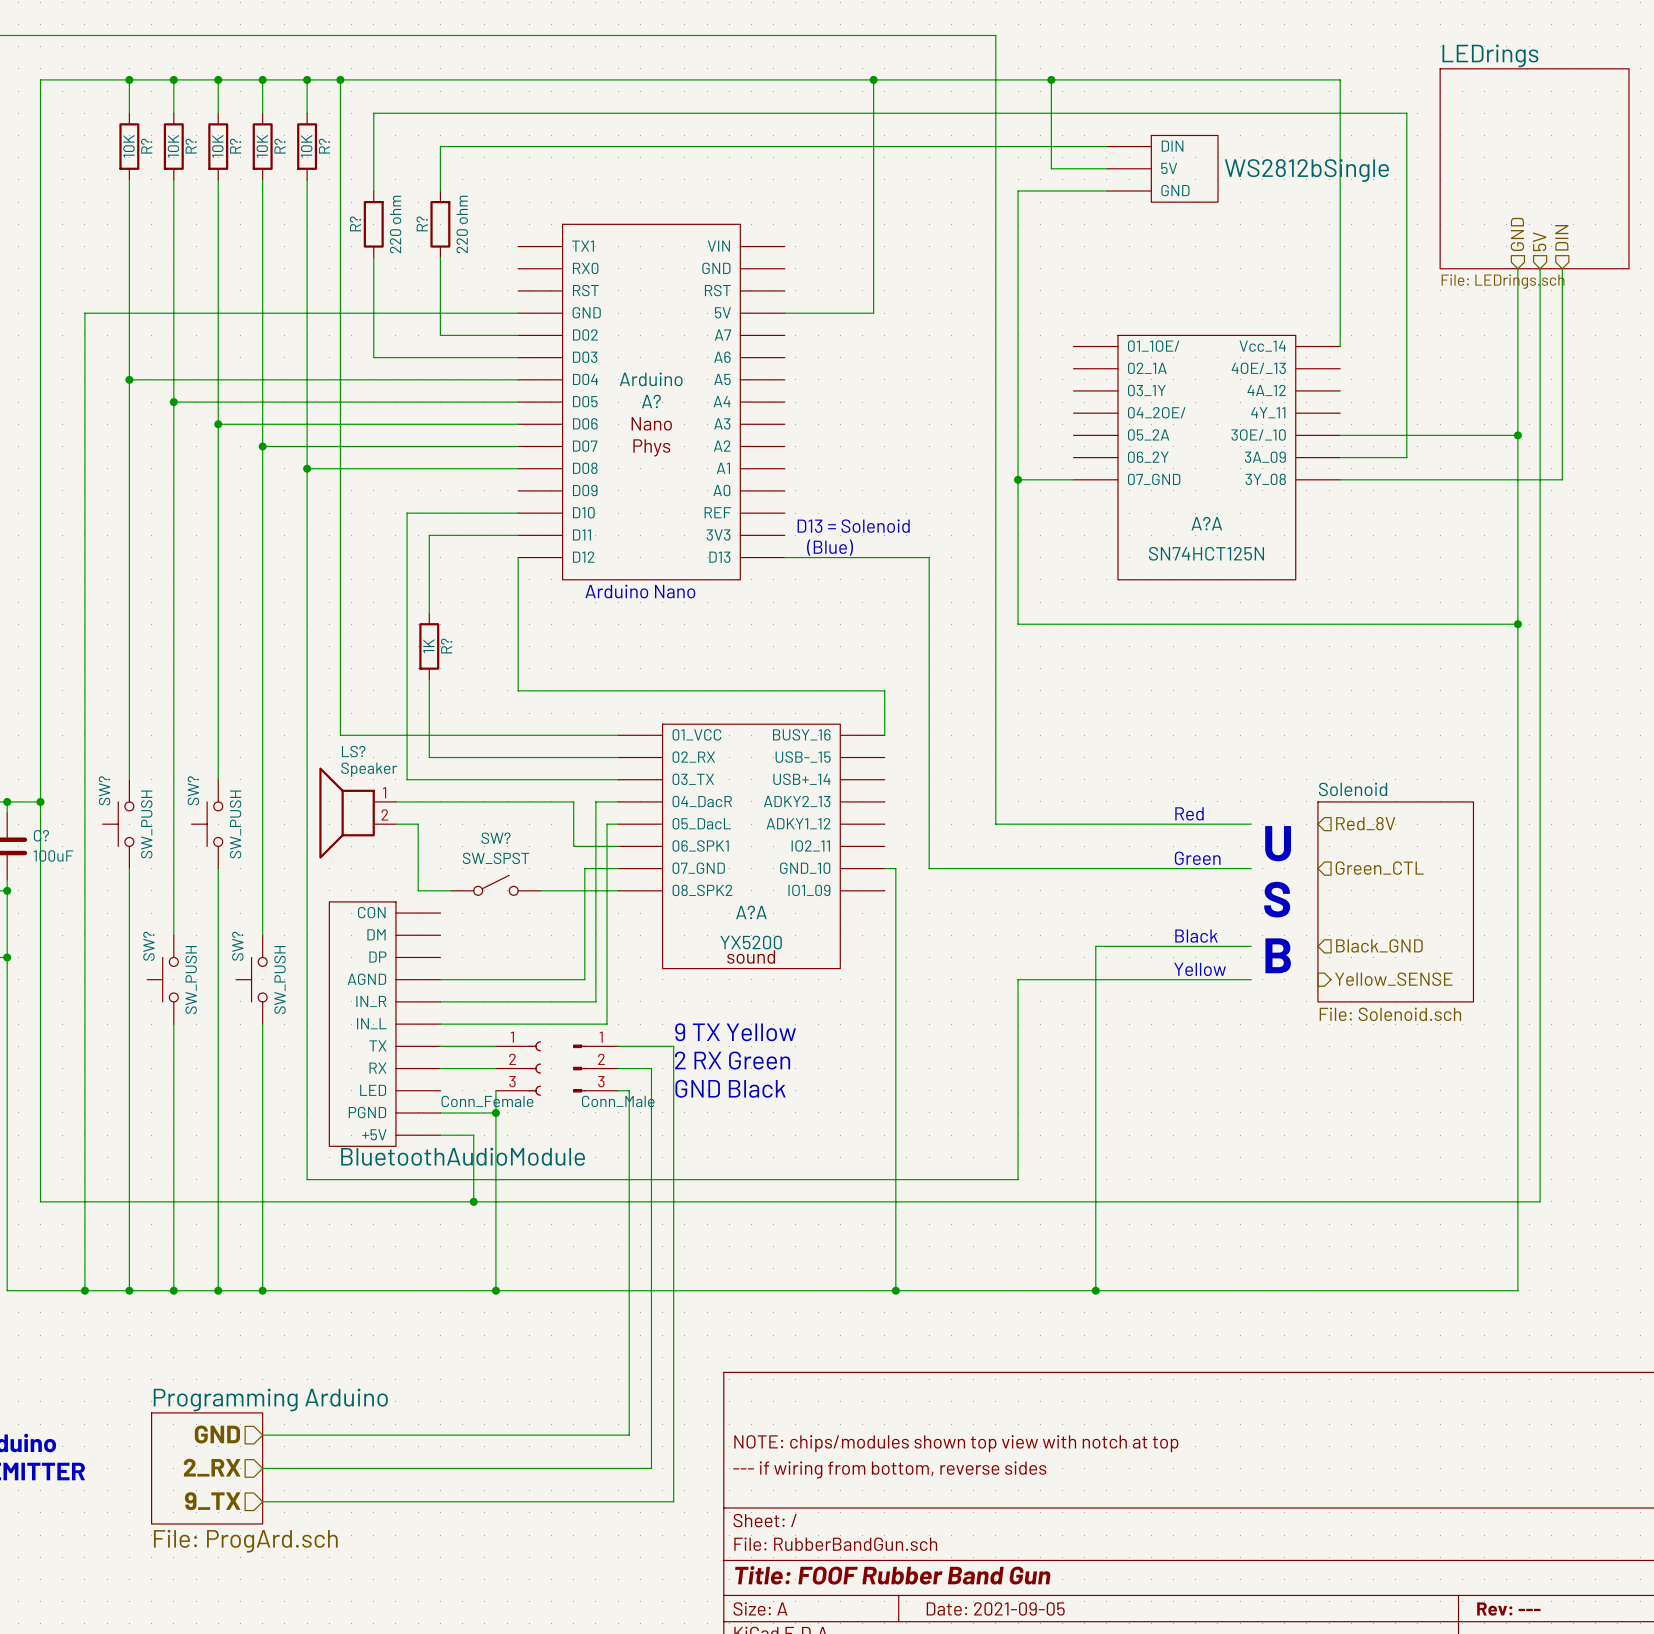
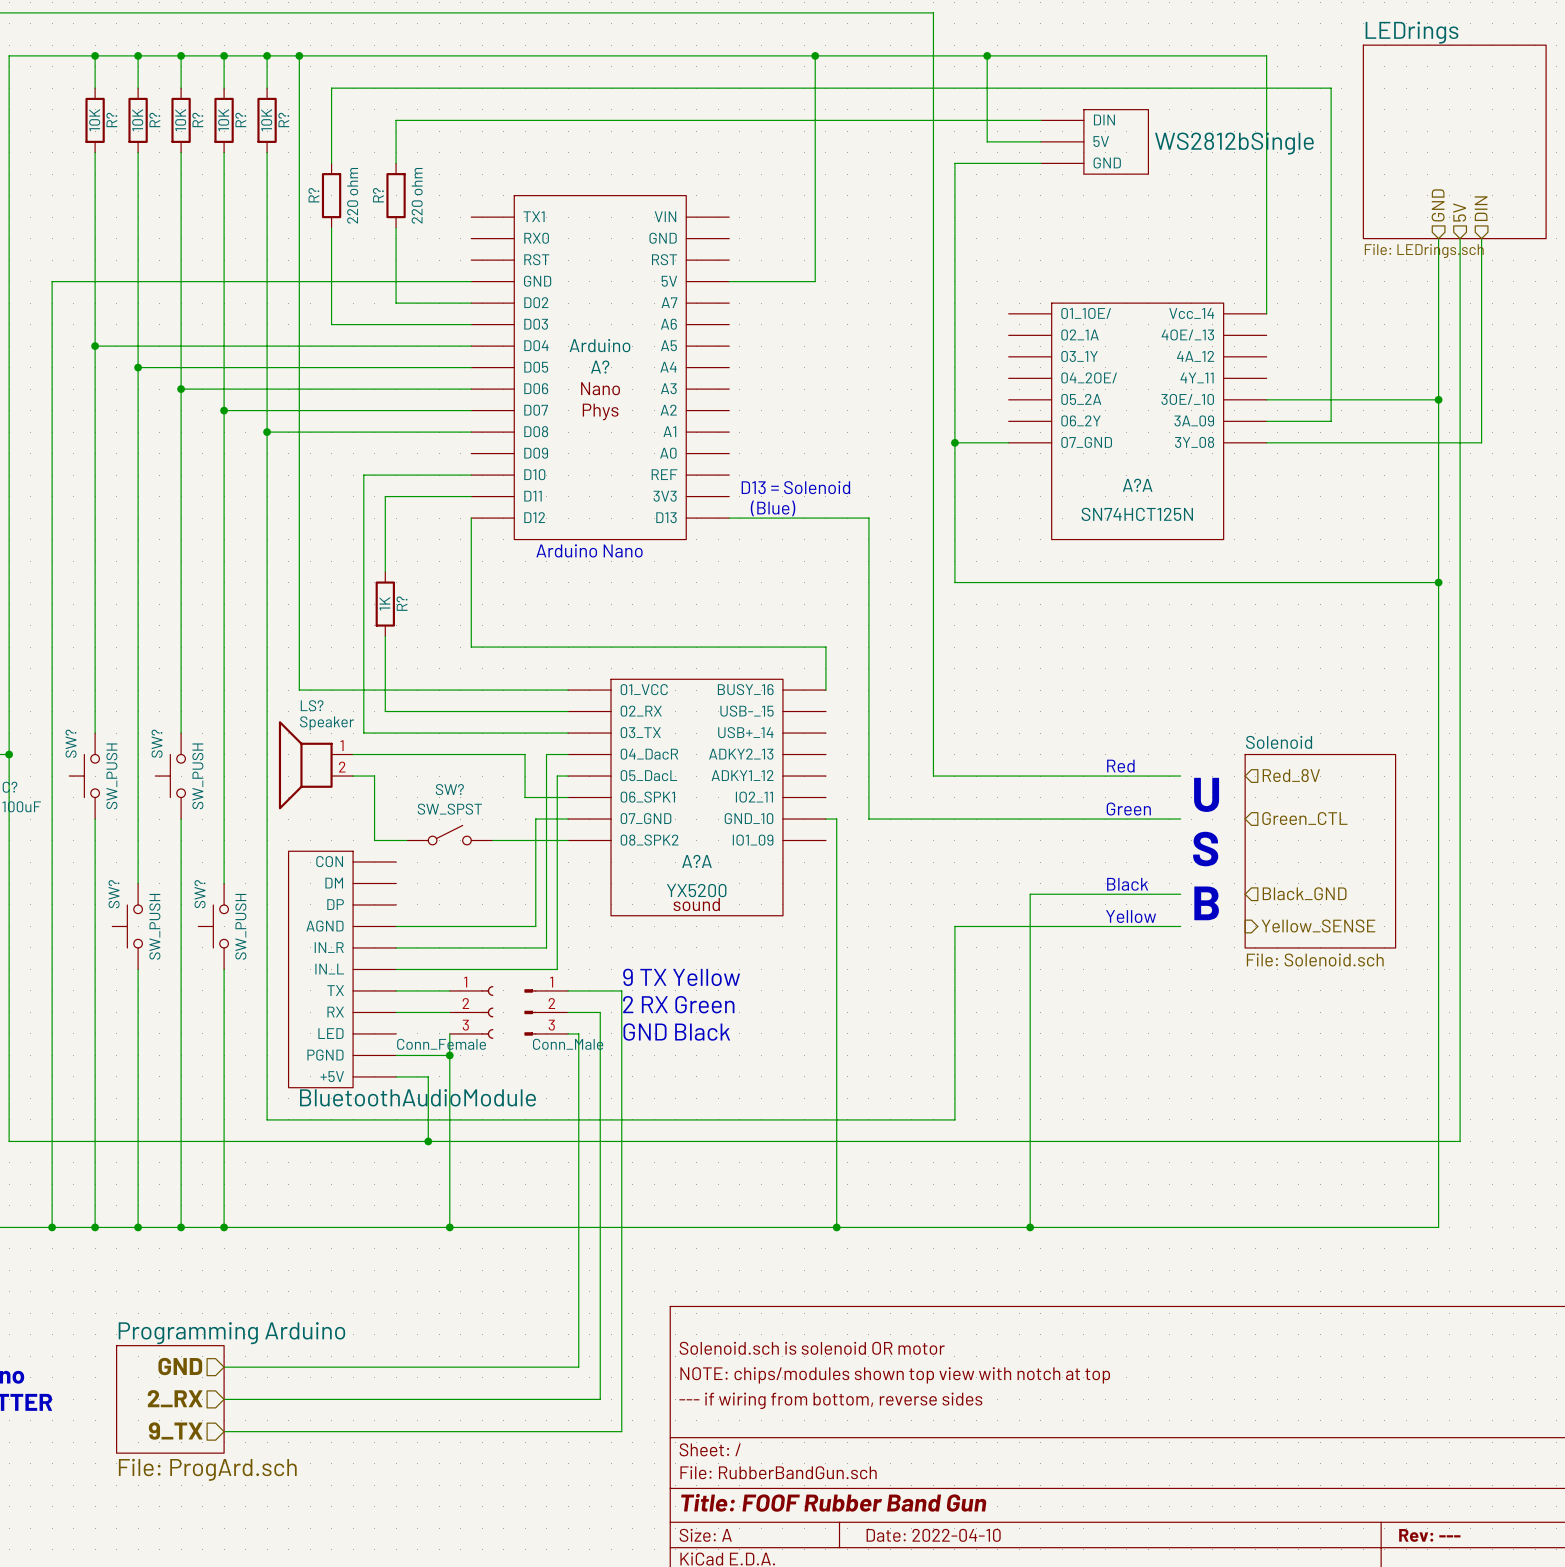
title block: none -> Solenoid.sch is solenoid OR motor (812, 1348)
title block: Date: 2021-09-05 (995, 1608) -> Date: 2022-04-10 (933, 1535)

